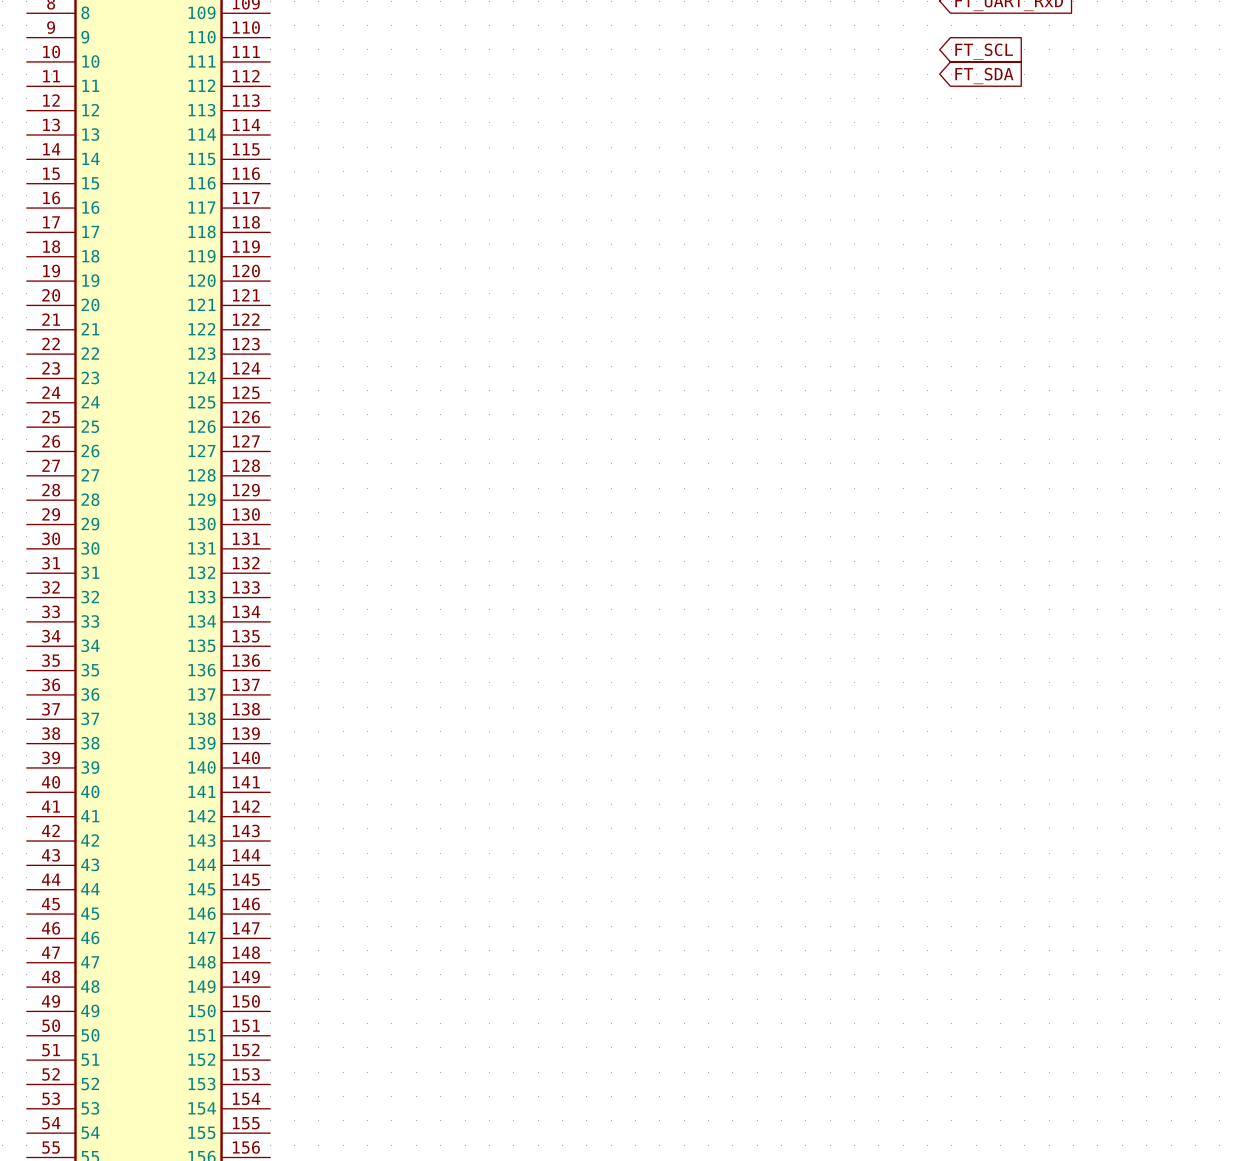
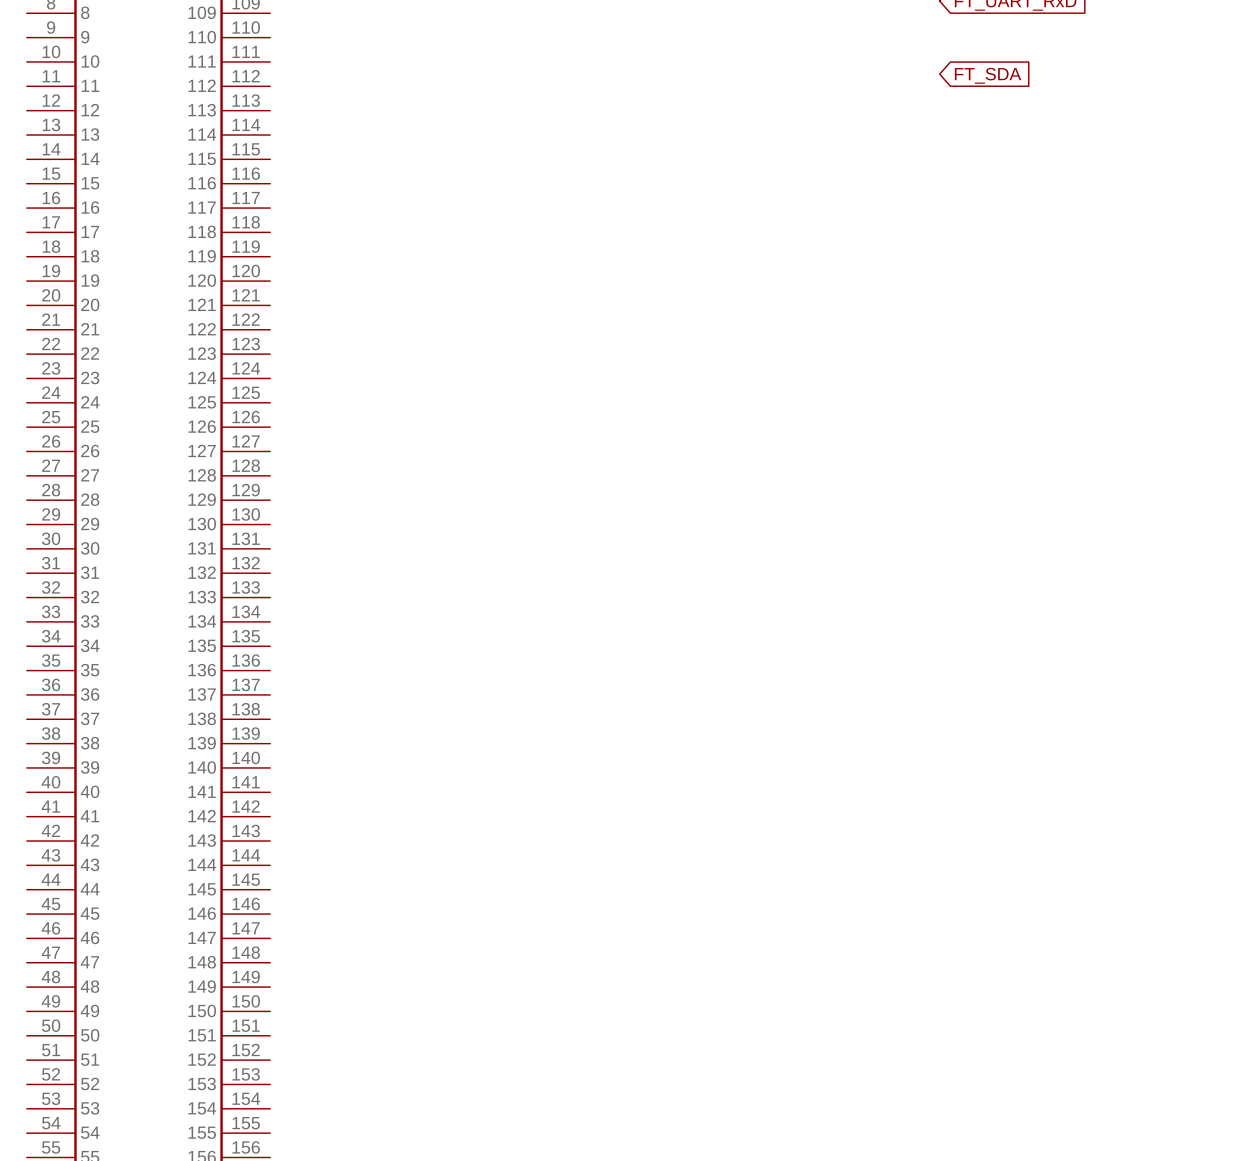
global label: FT_SCL (984, 51) -> none

